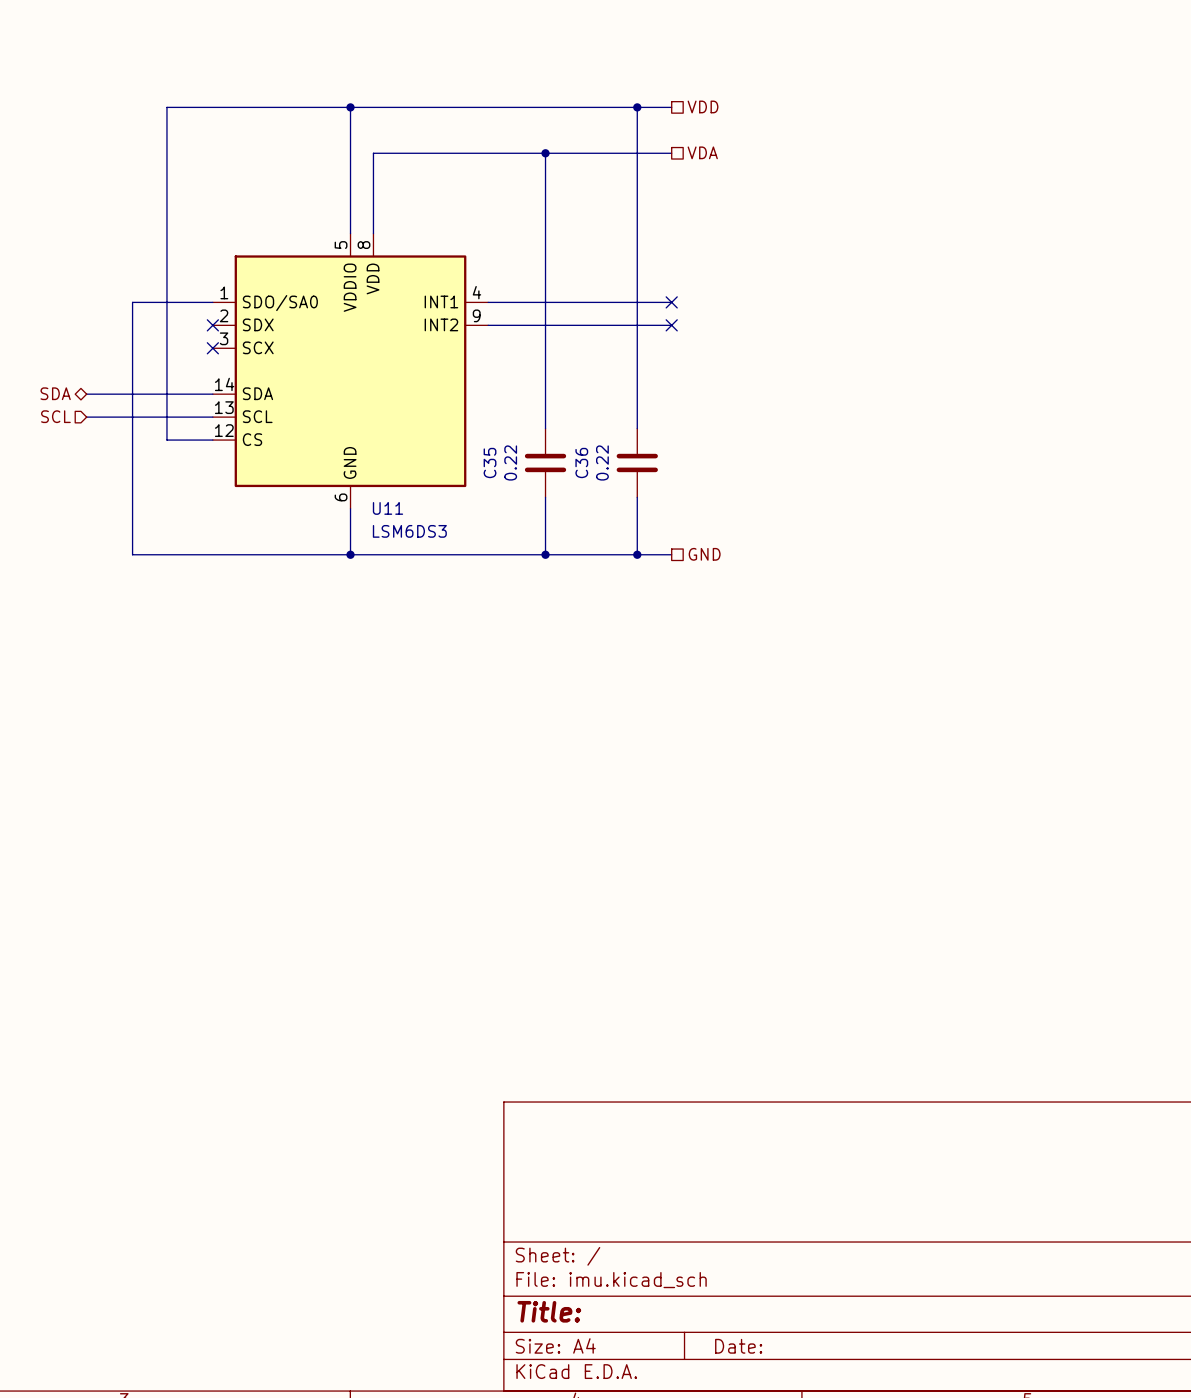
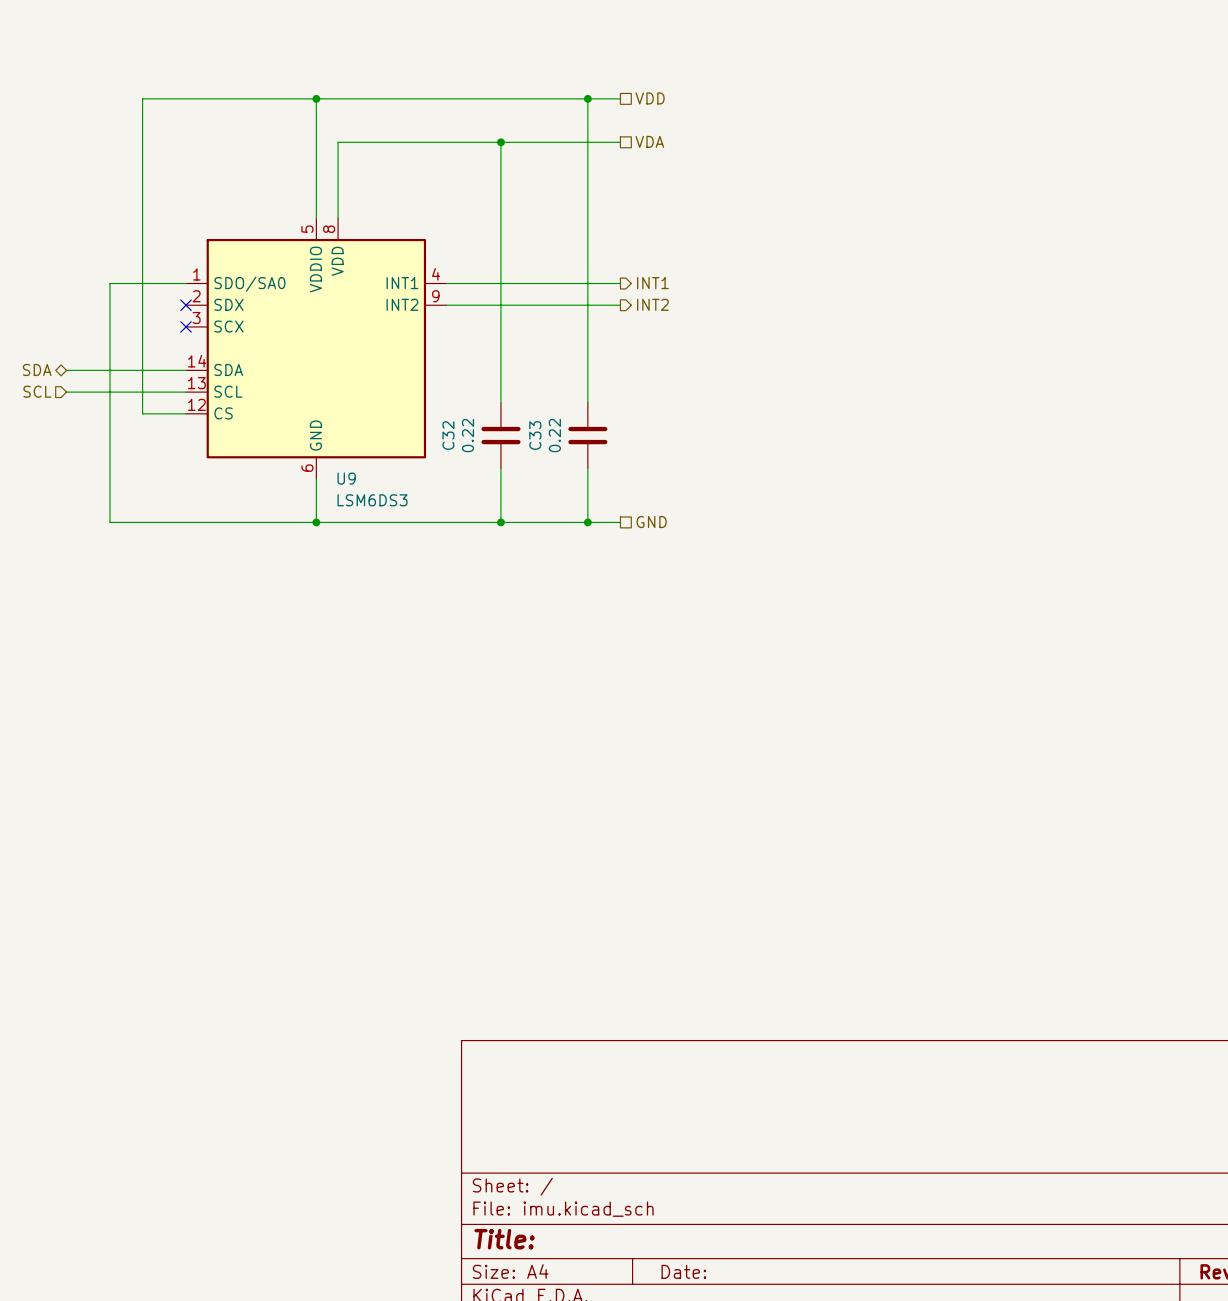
hierarchical label: none -> INT1 (652, 283)
no-connect mark: (671, 302) -> none
hierarchical label: none -> INT2 (652, 304)
no-connect mark: (671, 325) -> none
C35 name: C35 (490, 462) -> C32 (448, 435)
C36 name: C36 (581, 462) -> C33 (535, 435)
U11 name: U11 (387, 508) -> U9 (346, 478)

